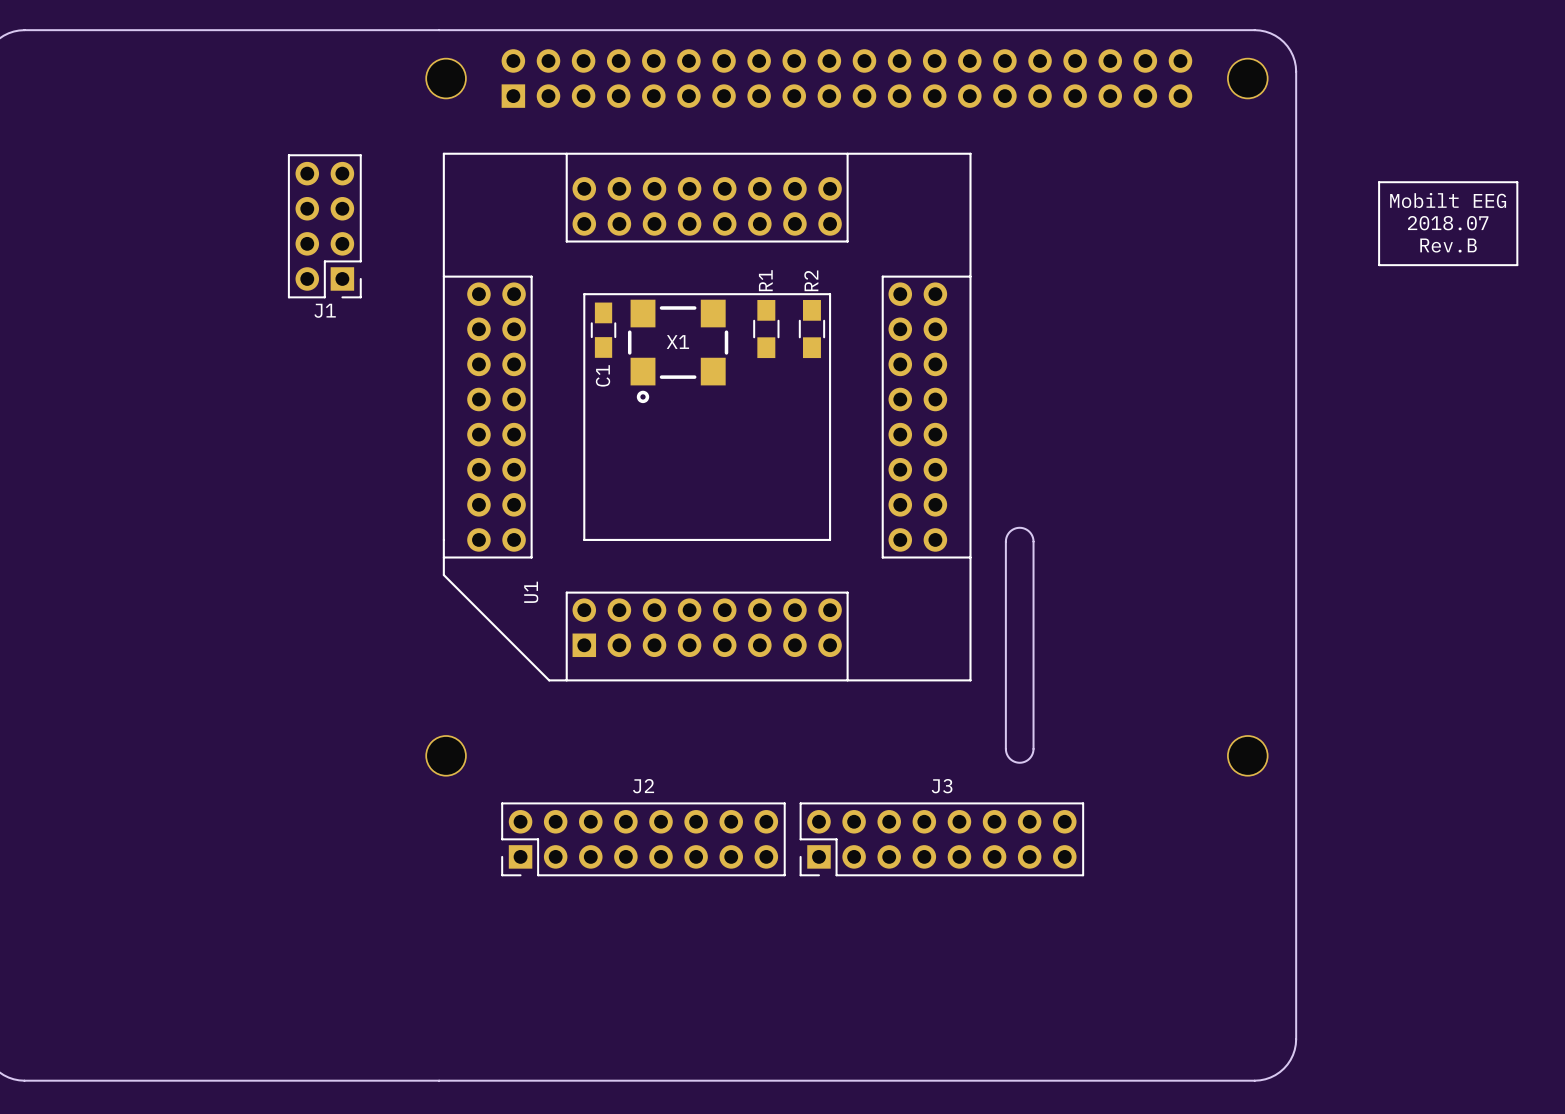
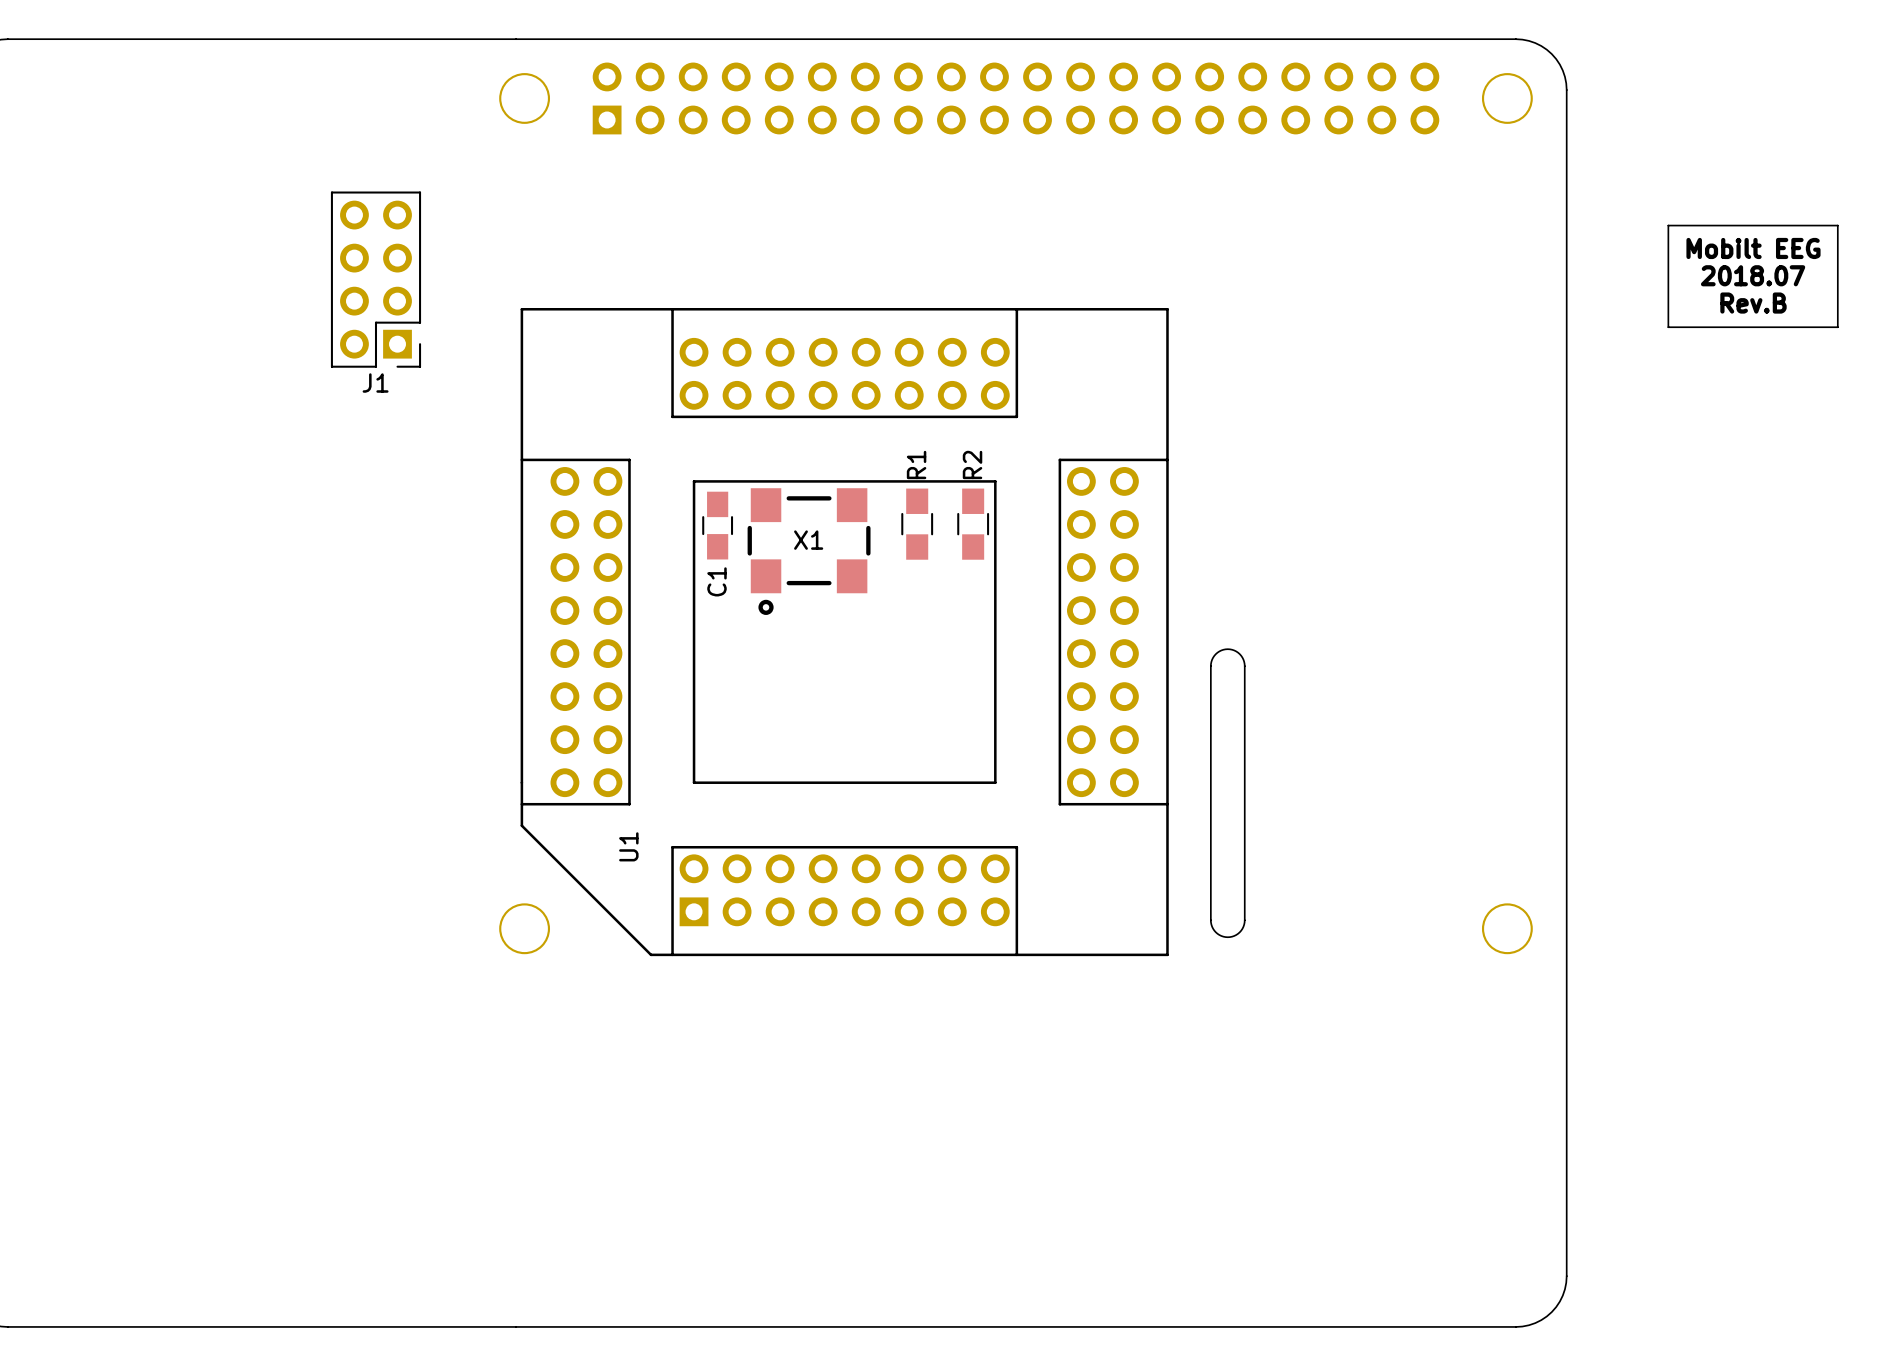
R1 position: (766, 329) -> (917, 524)
R2 position: (811, 329) -> (973, 524)
C1 position: (603, 330) -> (717, 525)
X1 position: (678, 351) -> (809, 551)
U1 position: (707, 417) -> (844, 632)
J2: (643, 839) -> none
J3: (941, 839) -> none

